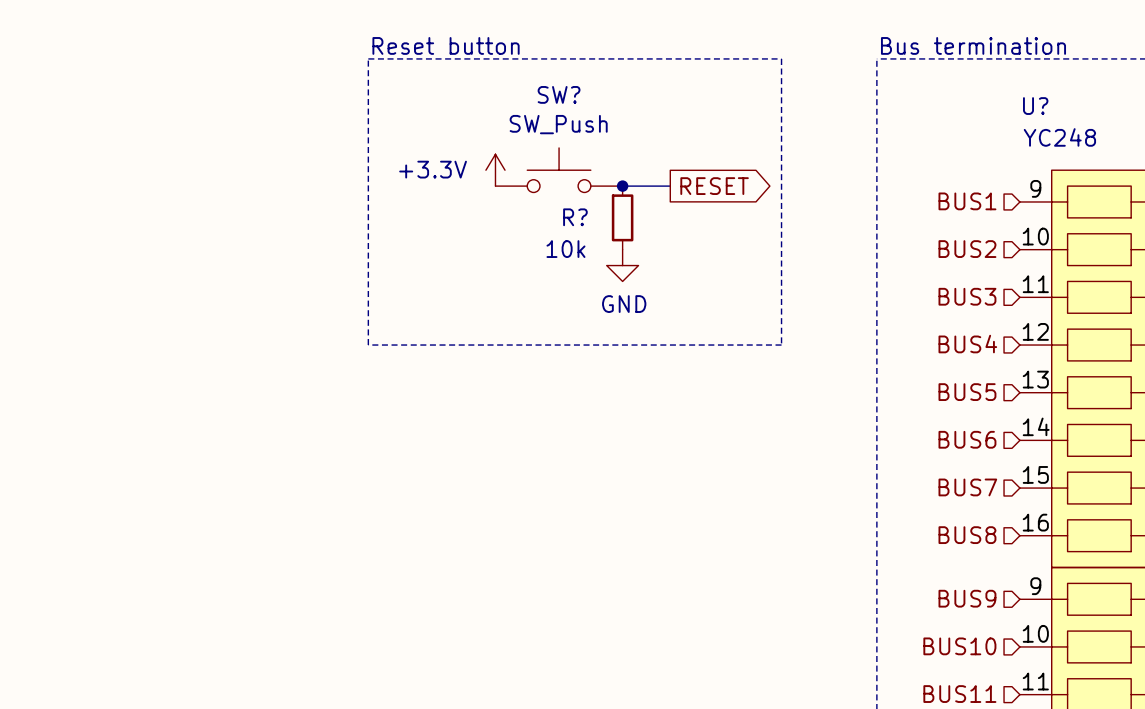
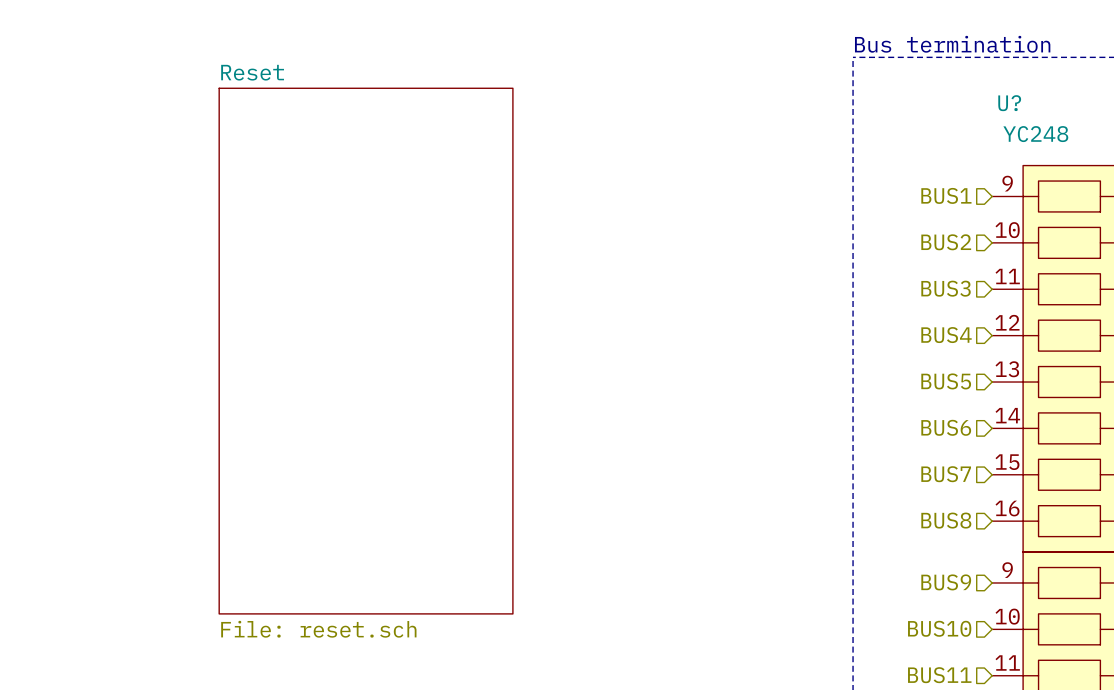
text: Reset button (446, 45) -> none
line: (368, 58) (781, 58) (781, 345) (368, 345) (368, 58) -> none
power symbol: +3.3V (495, 170) -> none
SW?: SW_Push (559, 170) -> none
wire: (622, 186) (670, 186) -> none
junction: (622, 186) -> none
global label: RESET (714, 186) -> none
R?: 10k (622, 217) -> none
power symbol: GND (622, 265) -> none
sheet Reset: none -> File: reset.sch (366, 351)

